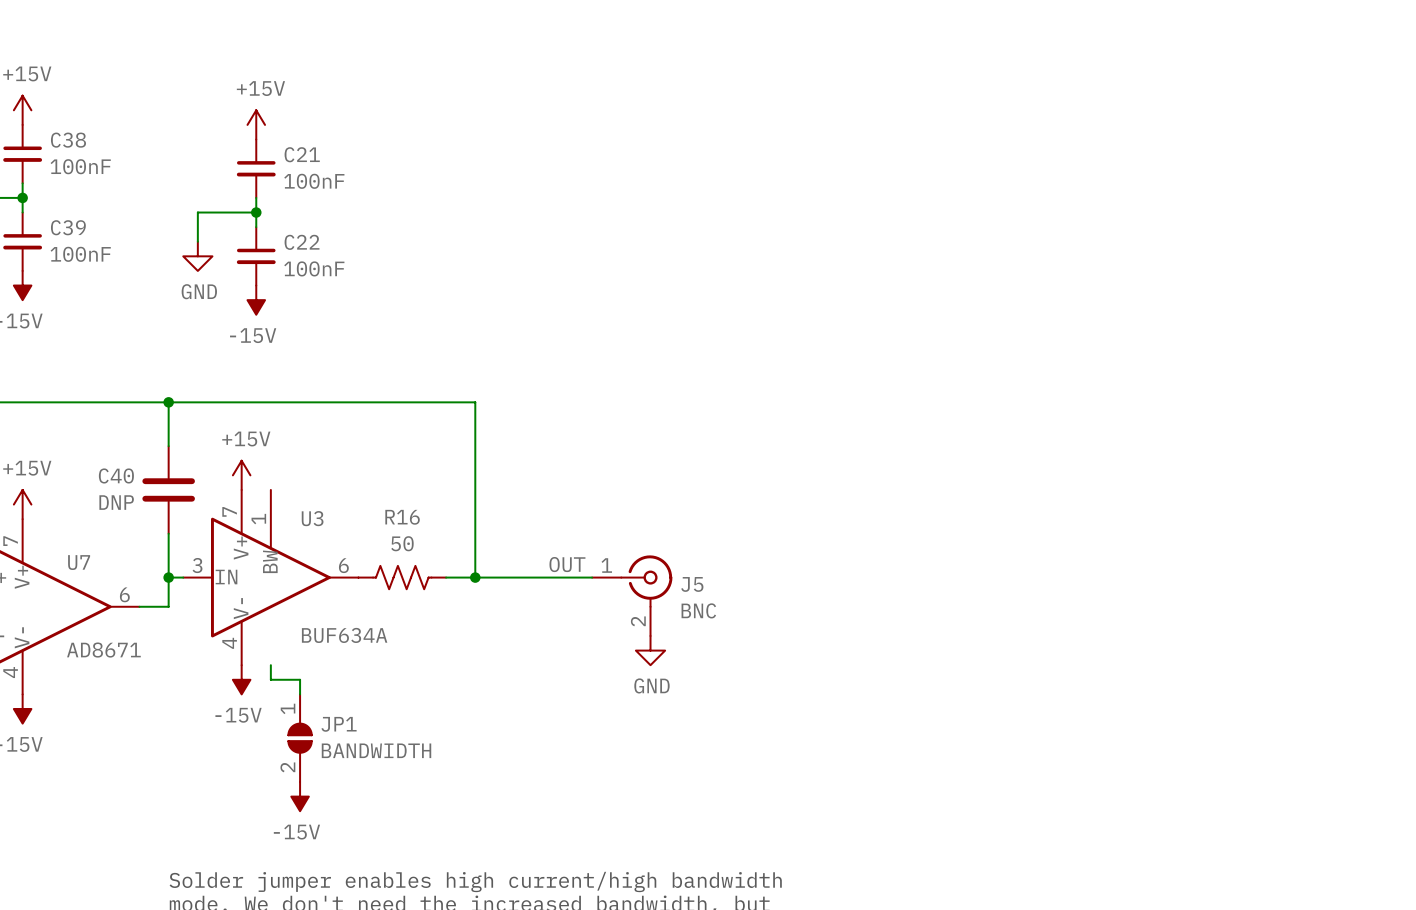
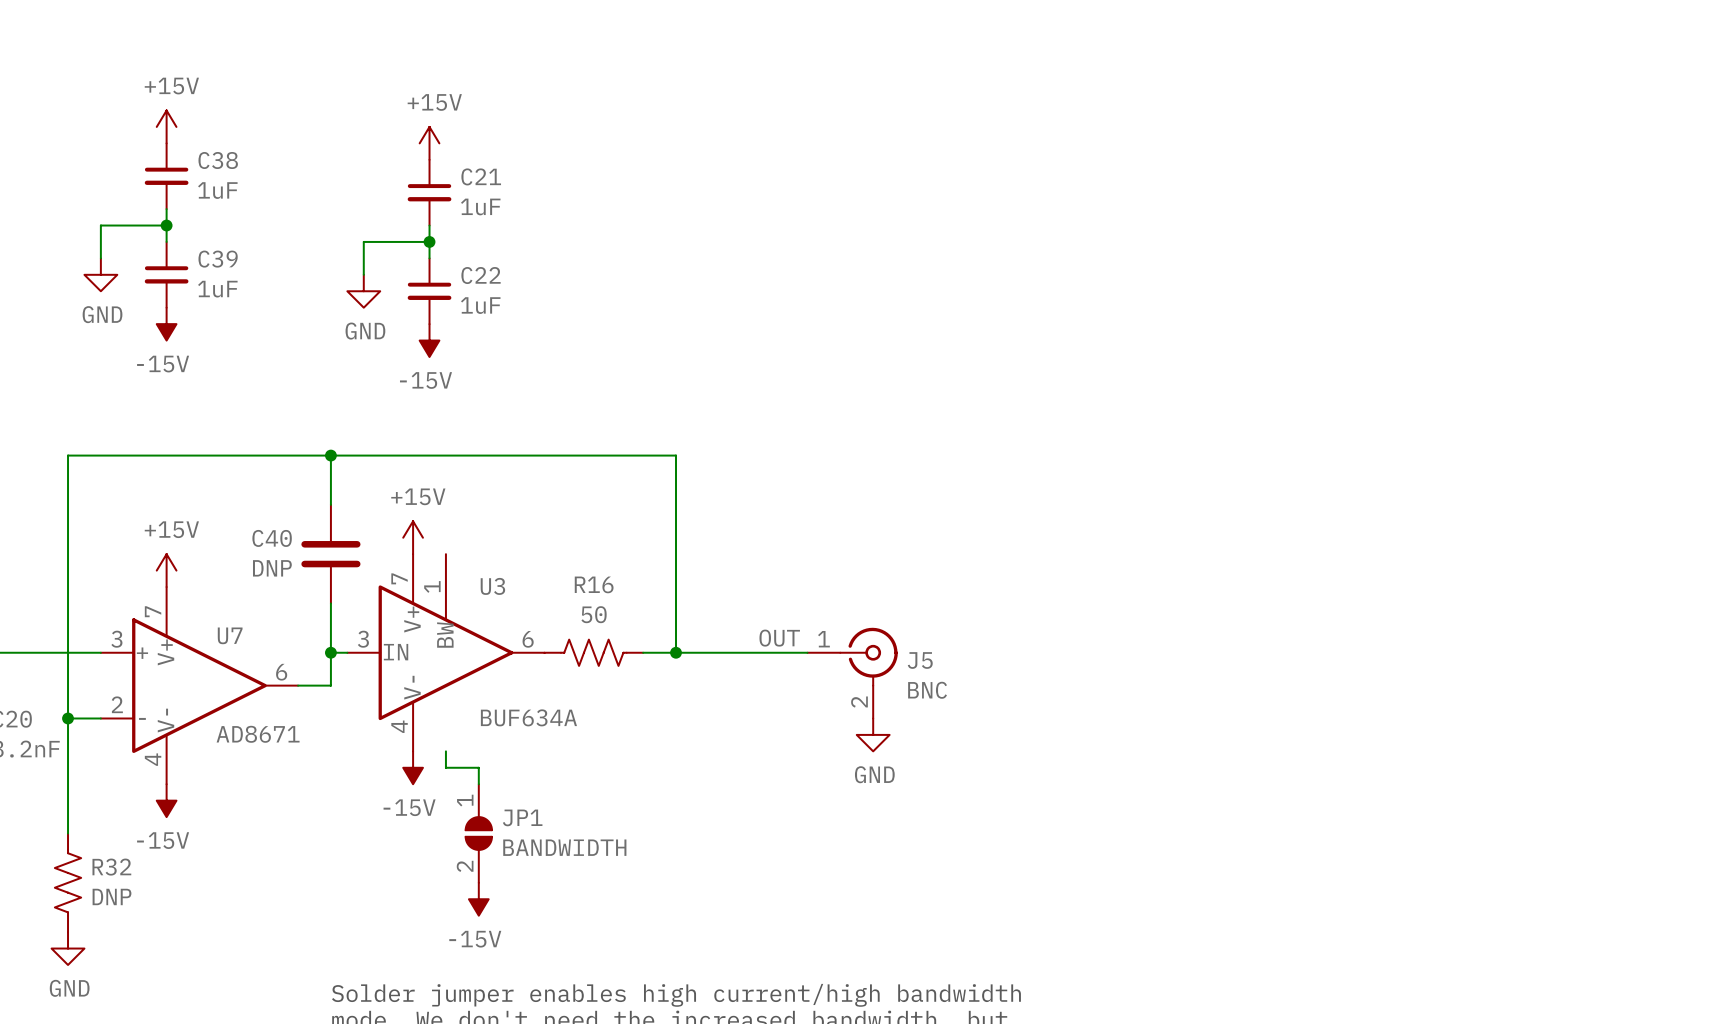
C38 value: 100nF (80, 166) -> 1uF (217, 190)
C21 value: 100nF (314, 181) -> 1uF (480, 206)
C39 value: 100nF (80, 254) -> 1uF (217, 289)
C22 value: 100nF (314, 268) -> 1uF (480, 305)

